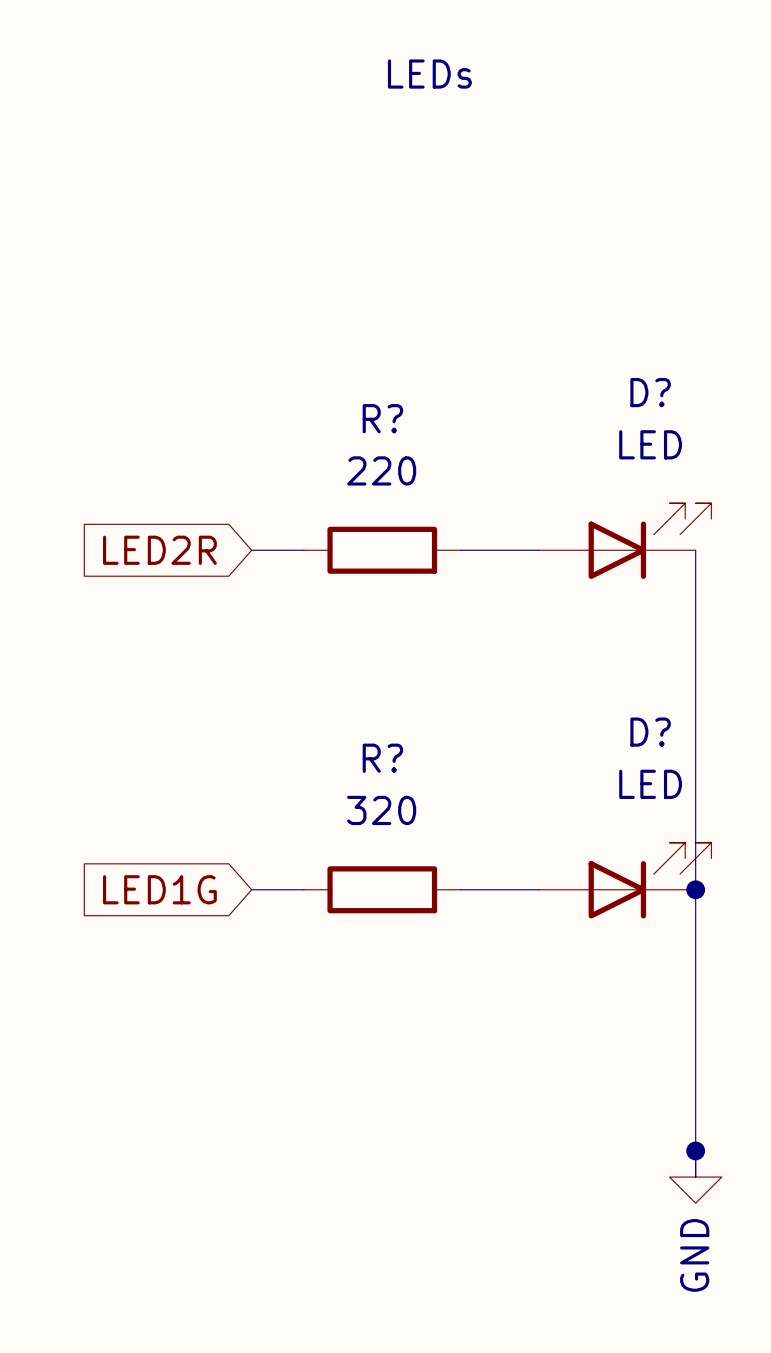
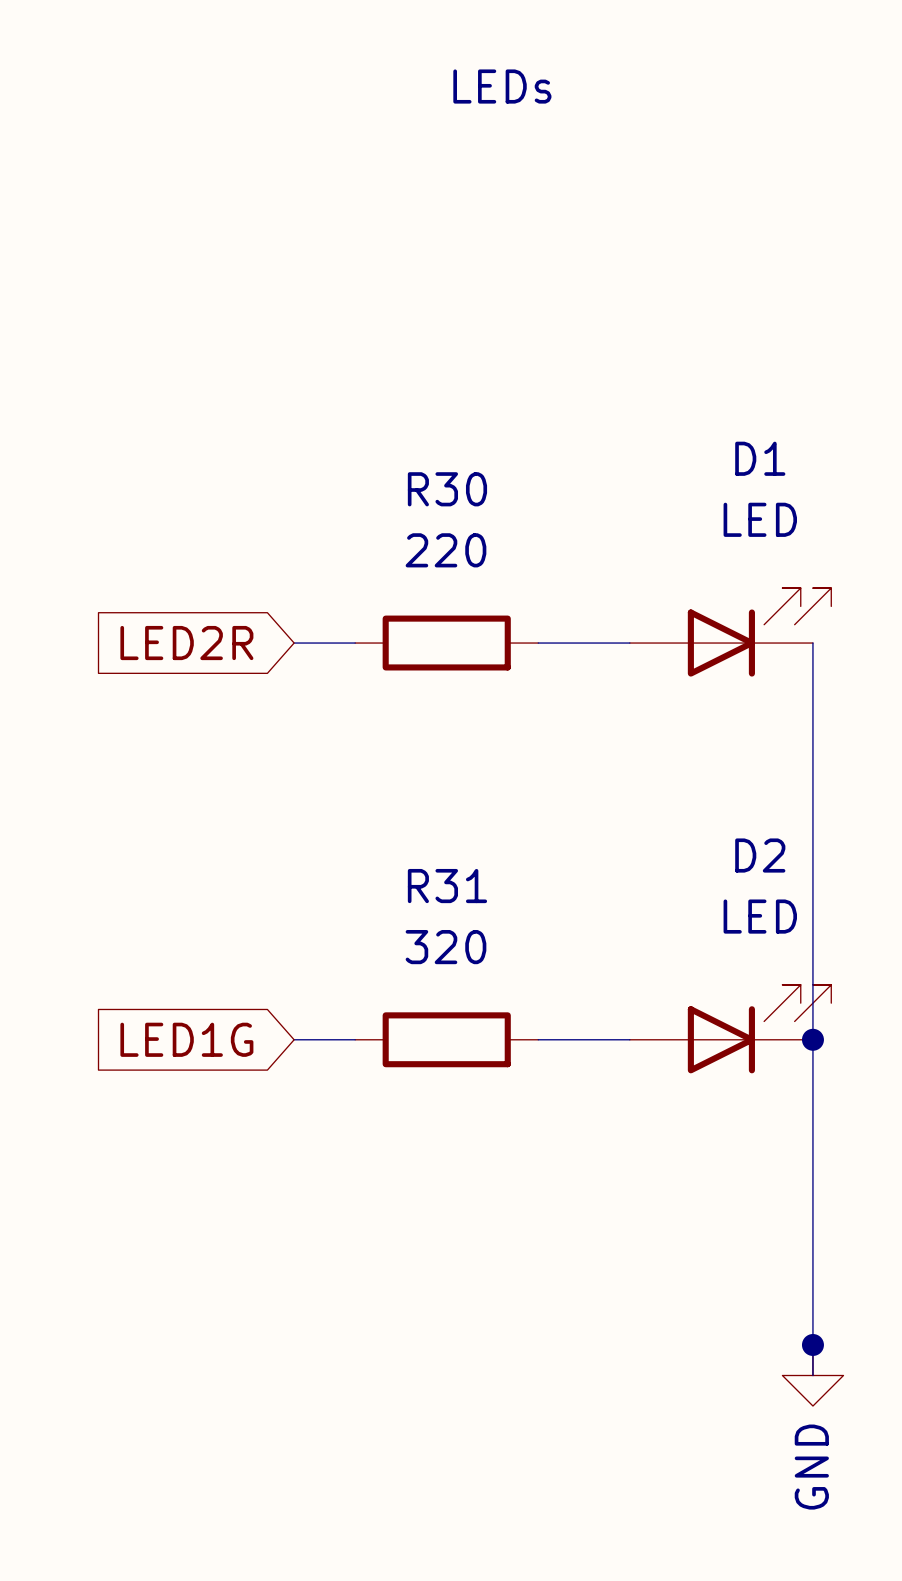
D? name: D? (650, 392) -> D1 (760, 458)
R? name: R? (382, 418) -> R30 (447, 489)
D? name: D? (650, 732) -> D2 (760, 855)
R? name: R? (382, 758) -> R31 (447, 886)

